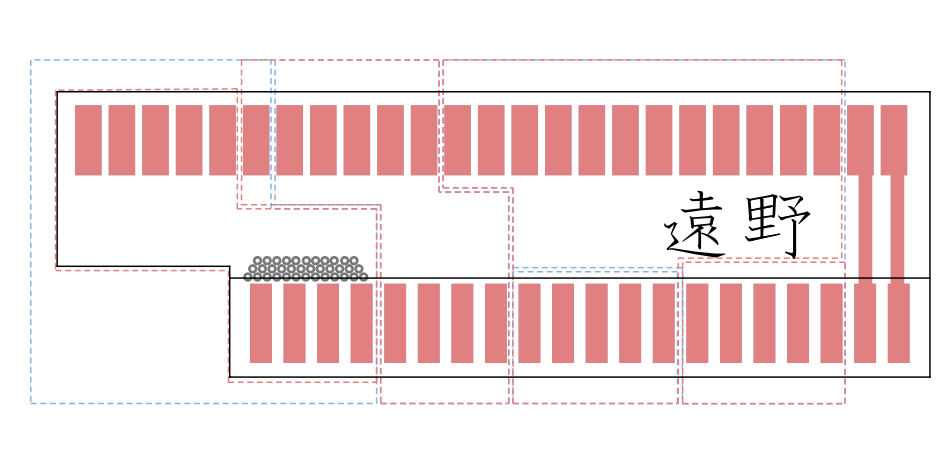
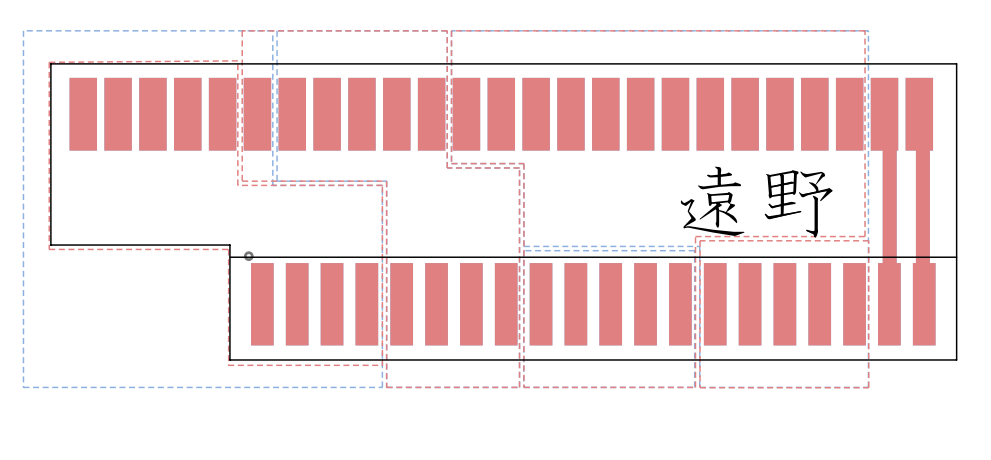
via: (257, 260) -> none
via: (267, 260) -> none
via: (276, 260) -> none
via: (286, 260) -> none
via: (295, 260) -> none
via: (306, 260) -> none
via: (315, 260) -> none
via: (324, 260) -> none
via: (334, 260) -> none
via: (344, 260) -> none
via: (353, 260) -> none
via: (252, 268) -> none
via: (262, 268) -> none
via: (272, 268) -> none
via: (281, 268) -> none
via: (291, 268) -> none
via: (300, 268) -> none
via: (310, 268) -> none
via: (320, 268) -> none
via: (329, 268) -> none
via: (339, 268) -> none
via: (349, 268) -> none
via: (358, 268) -> none
via: (257, 277) -> none
via: (267, 277) -> none
via: (276, 277) -> none
via: (286, 277) -> none
via: (296, 277) -> none
via: (305, 277) -> none
via: (315, 277) -> none
via: (325, 277) -> none
via: (334, 277) -> none
via: (344, 277) -> none
via: (353, 277) -> none
via: (363, 277) -> none

